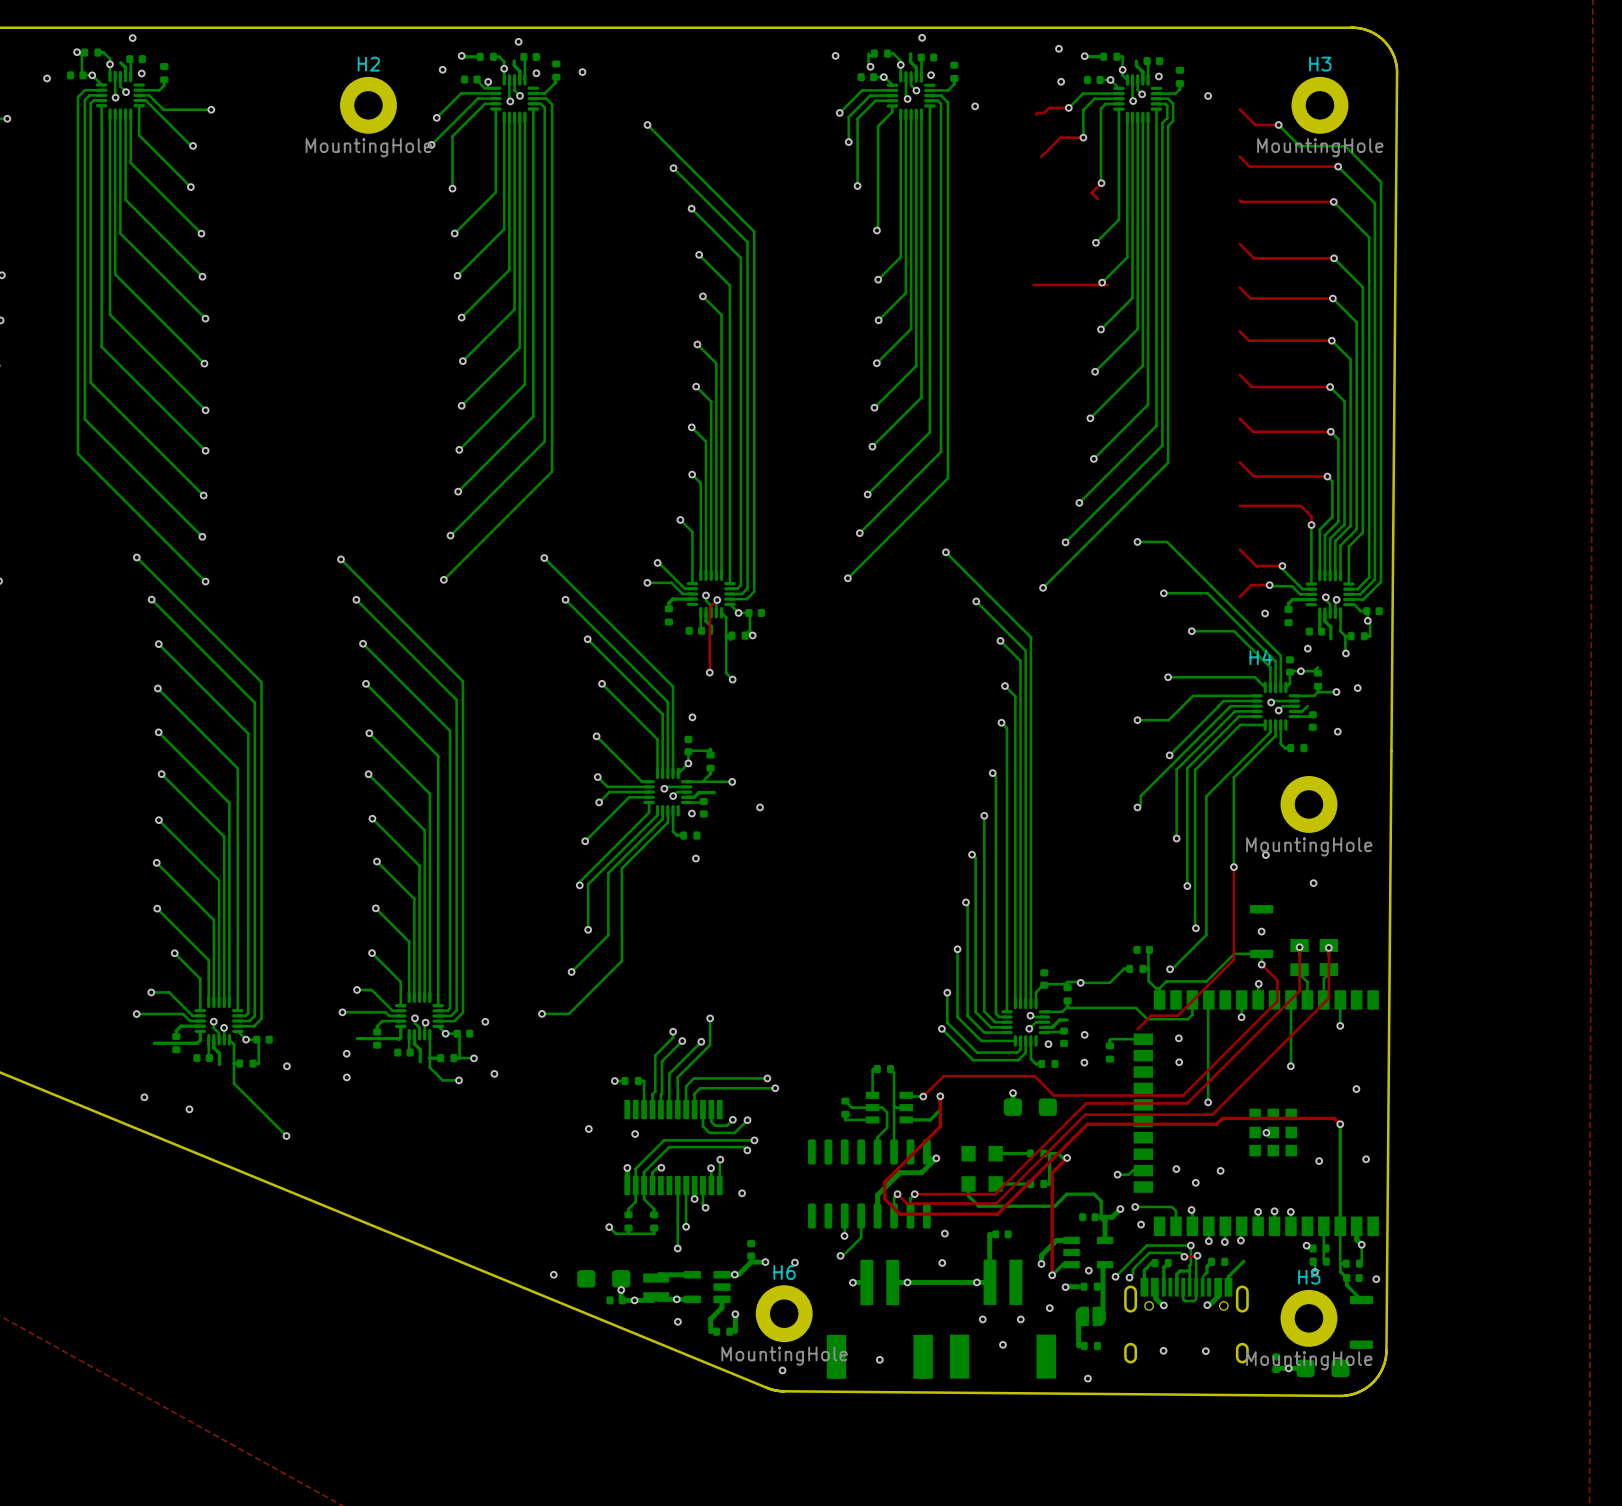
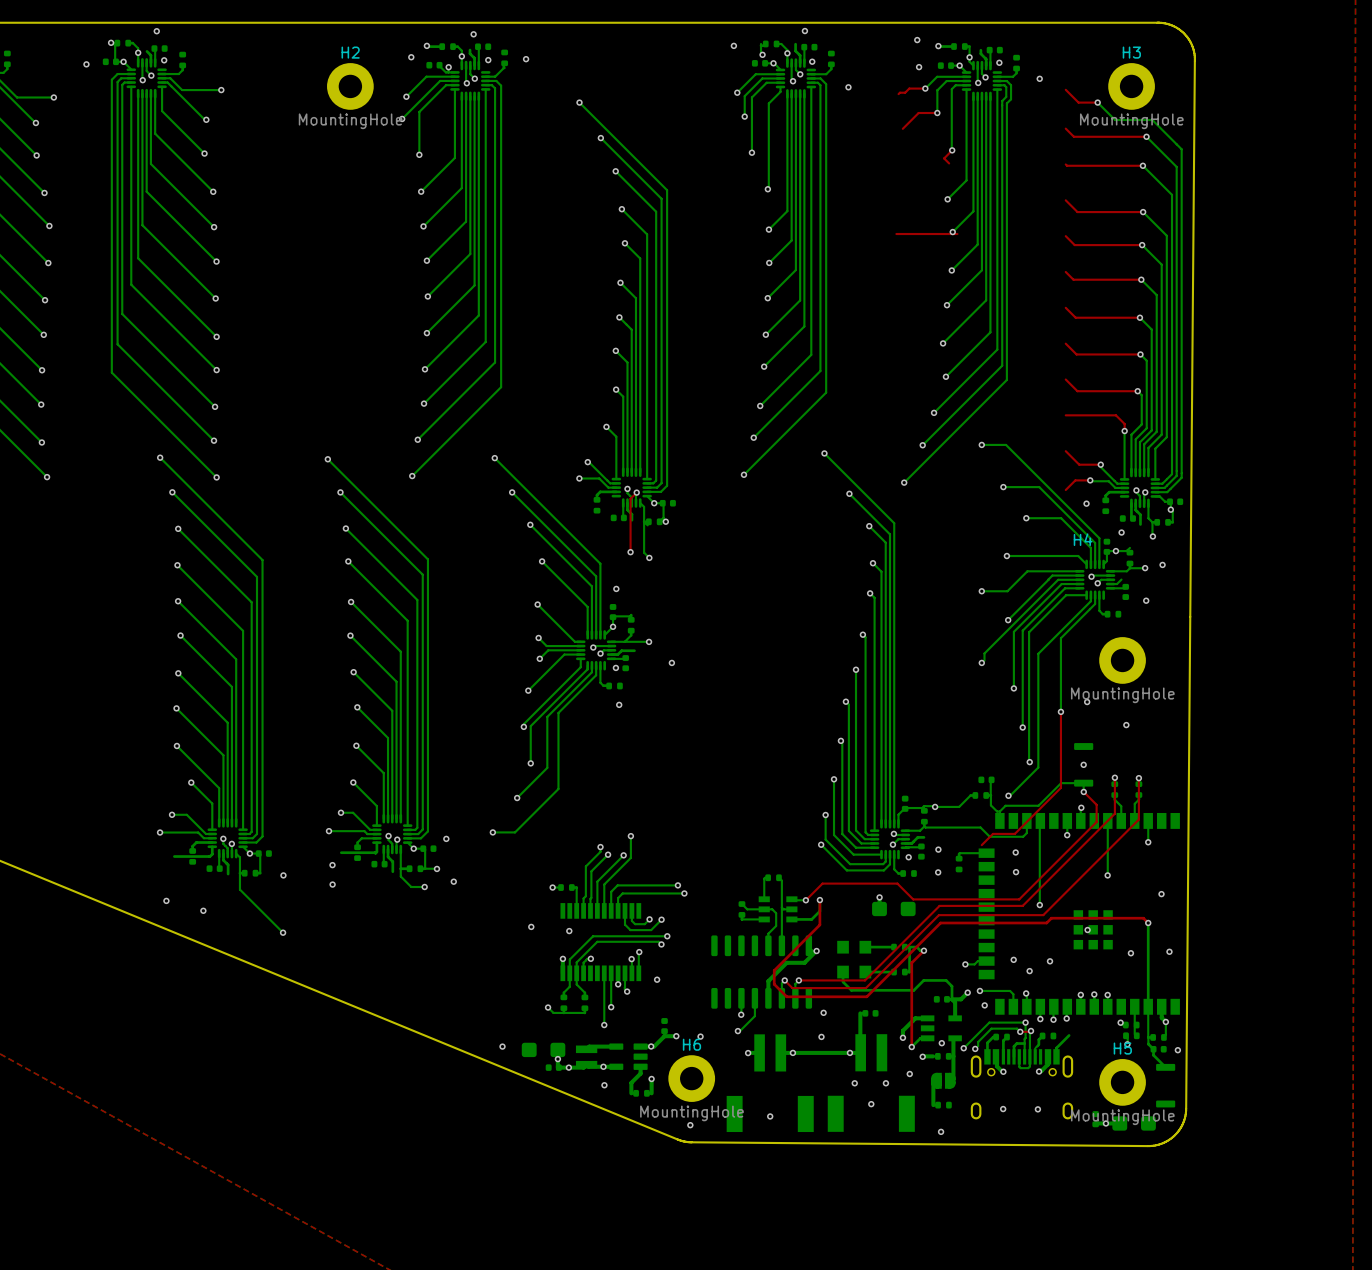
part footprint: [1319, 938, 1339, 977] -> [1135, 781, 1143, 798]
part footprint: [1290, 939, 1309, 977] -> [1111, 781, 1119, 798]

